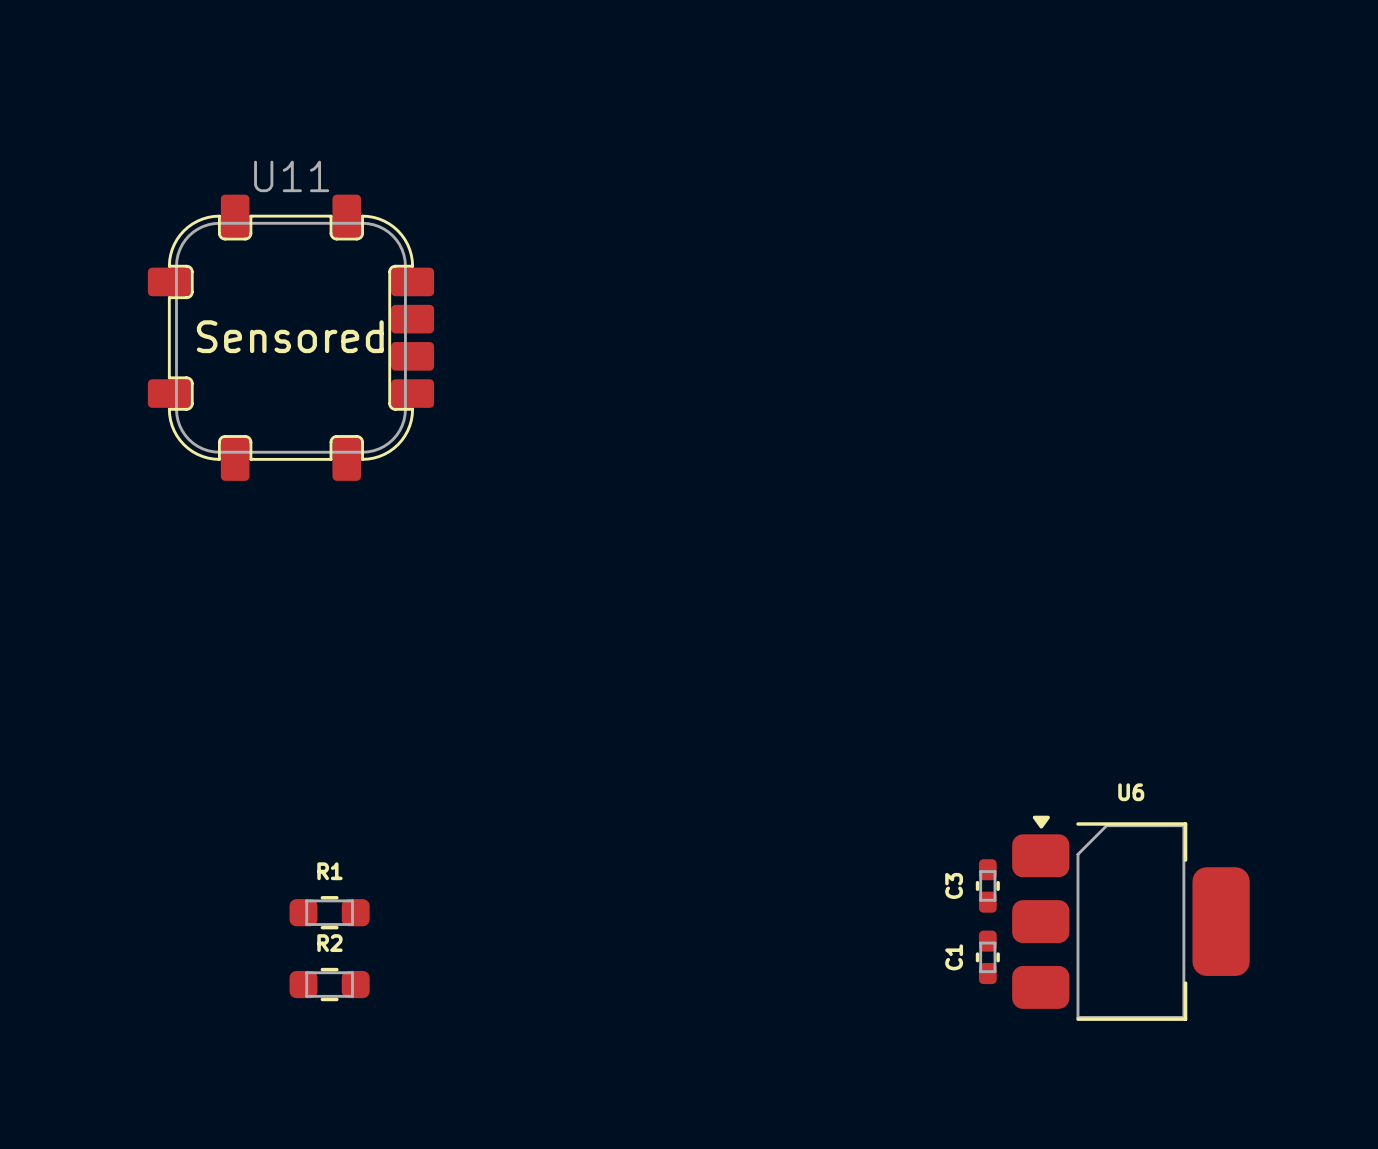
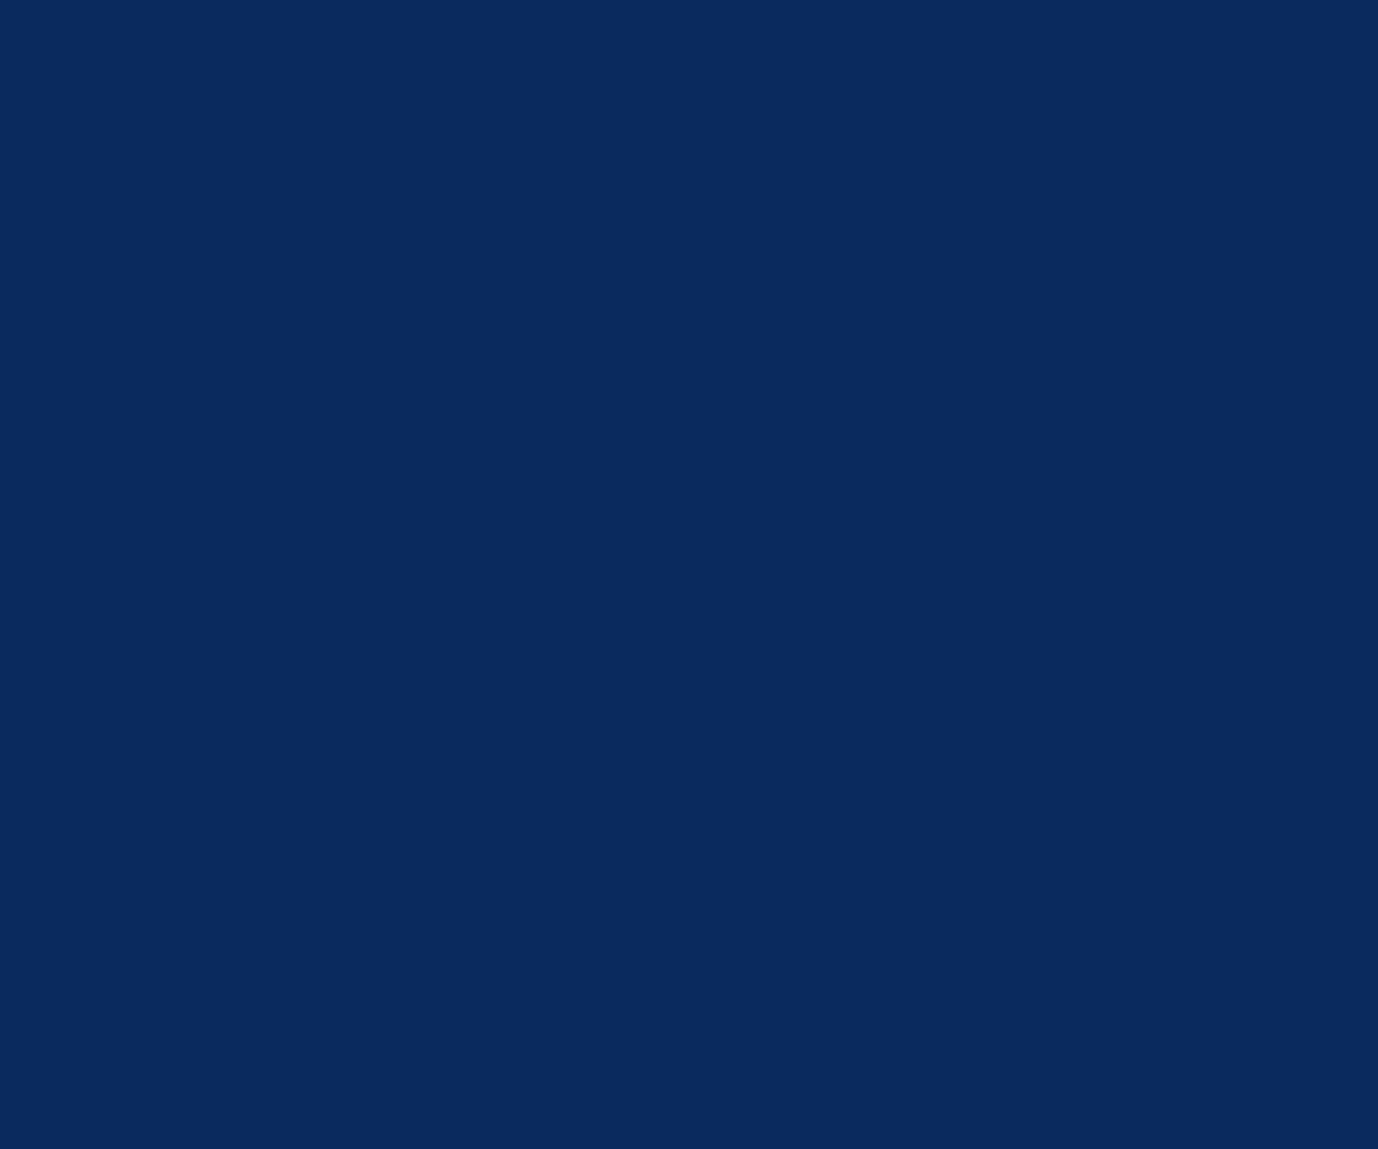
U11: Sensored (290, 337) -> none
C3: (987, 885) -> none
R1: (329, 912) -> none
U6: (1130, 918) -> none
C1: (987, 957) -> none
R2: (329, 984) -> none

